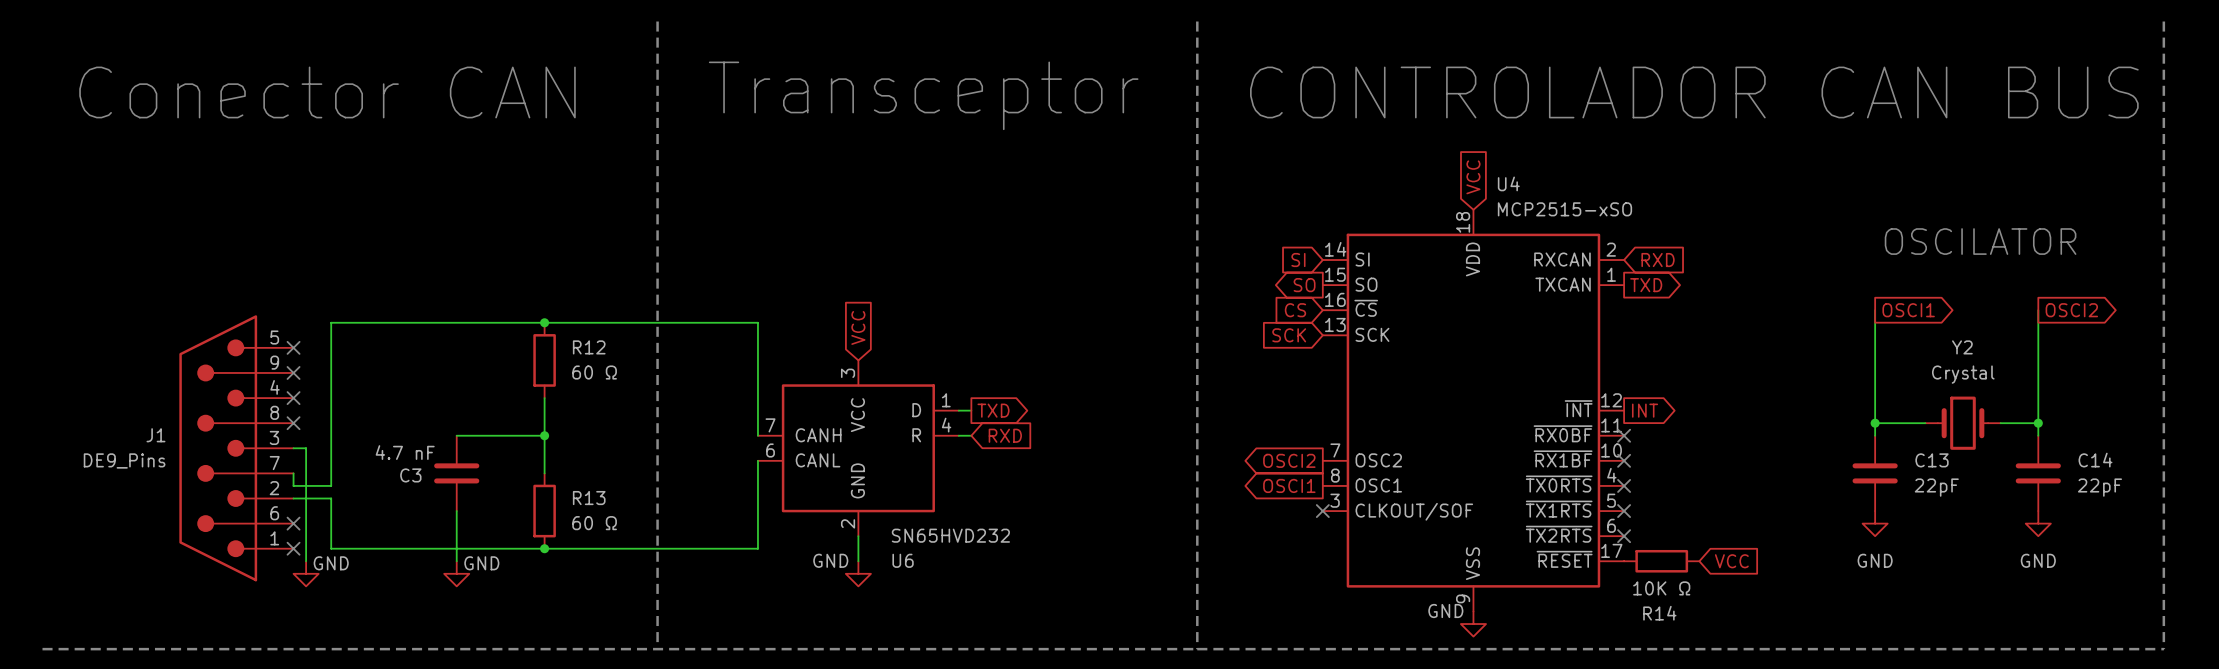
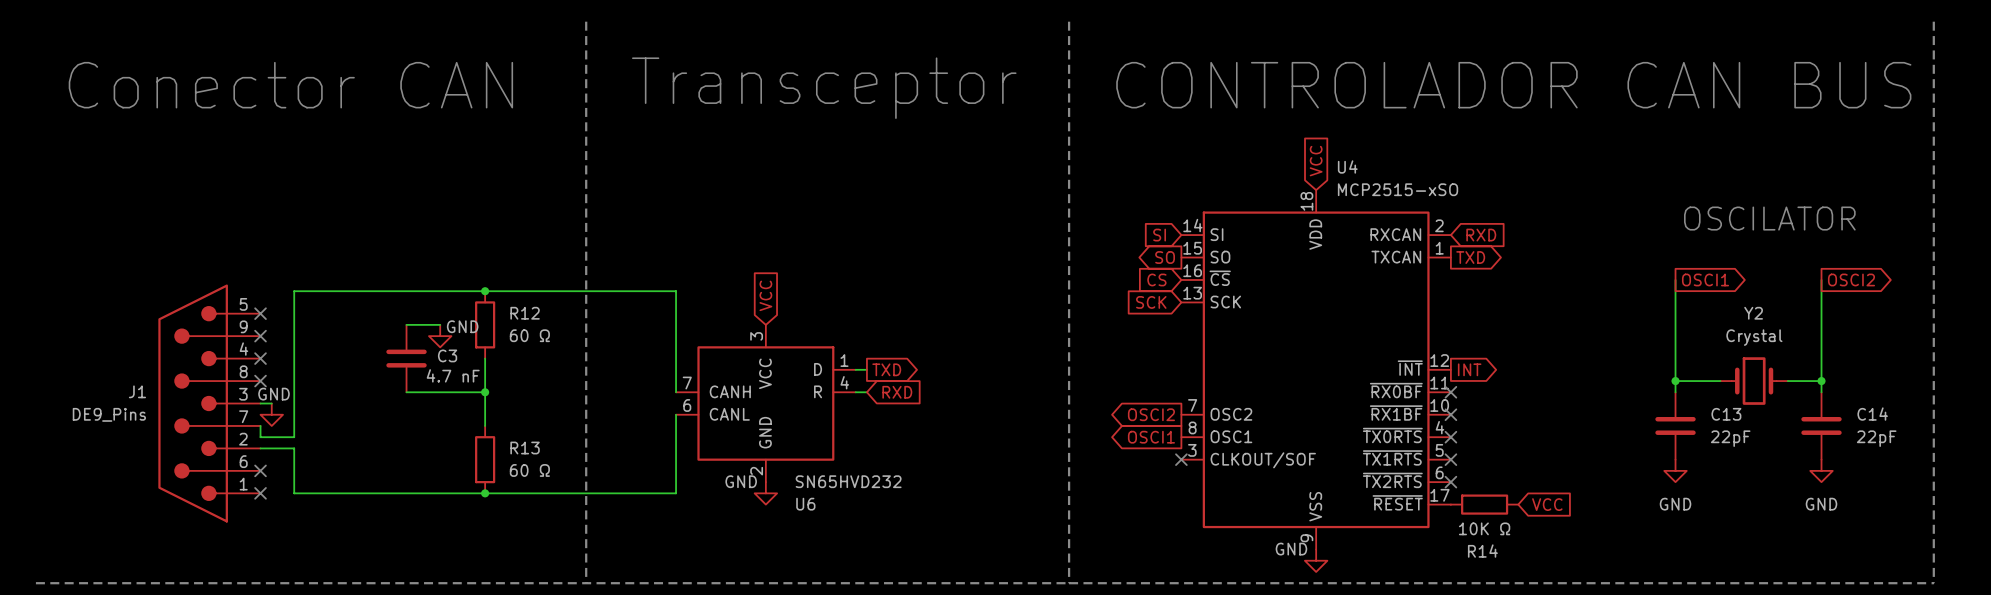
wire: none -> (406, 324) (440, 324)
power symbol: none -> GND (440, 336)
wire: (306, 448) (306, 561) -> none
C3 value position: 4.7 nF (405, 452) -> 4.7 nF (453, 375)
power symbol: none -> GND (271, 414)
C3 position: (456, 473) -> (406, 358)
C3 name position: C3 (410, 475) -> C3 (447, 355)
wire: (456, 511) (456, 561) -> none
power symbol: GND (306, 573) -> none
power symbol: GND (456, 573) -> none
power symbol position: GND (858, 573) -> GND (765, 493)

